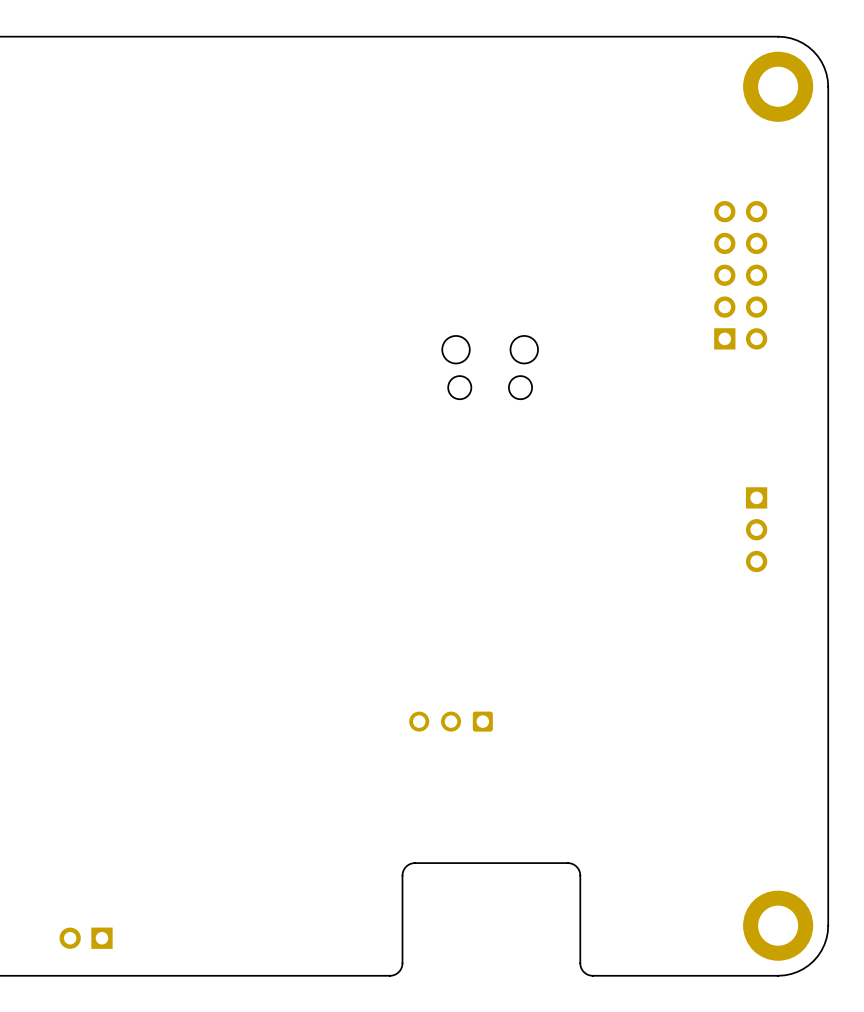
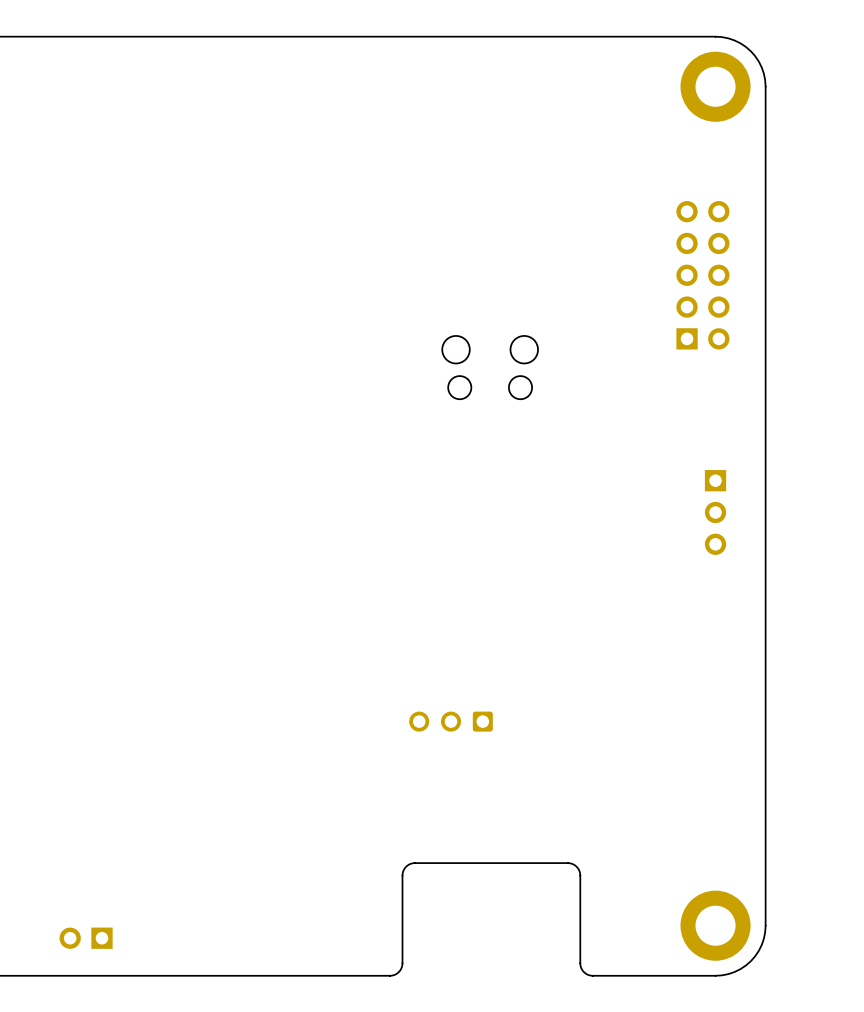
board edge: (715, 36) (778, 36) (797, 40) (808, 47) (817, 56) (824, 67) (828, 86) (827, 932) (824, 944) (817, 956) (808, 965) (797, 971) (778, 975) (715, 975) -> (715, 36) (734, 40) (750, 51) (761, 67) (765, 86) (765, 925) (761, 944) (750, 961) (734, 971) (715, 975)
part position: (778, 86) -> (715, 86)
part position: (740, 275) -> (702, 275)
part position: (756, 529) -> (715, 512)
part position: (778, 925) -> (715, 925)

